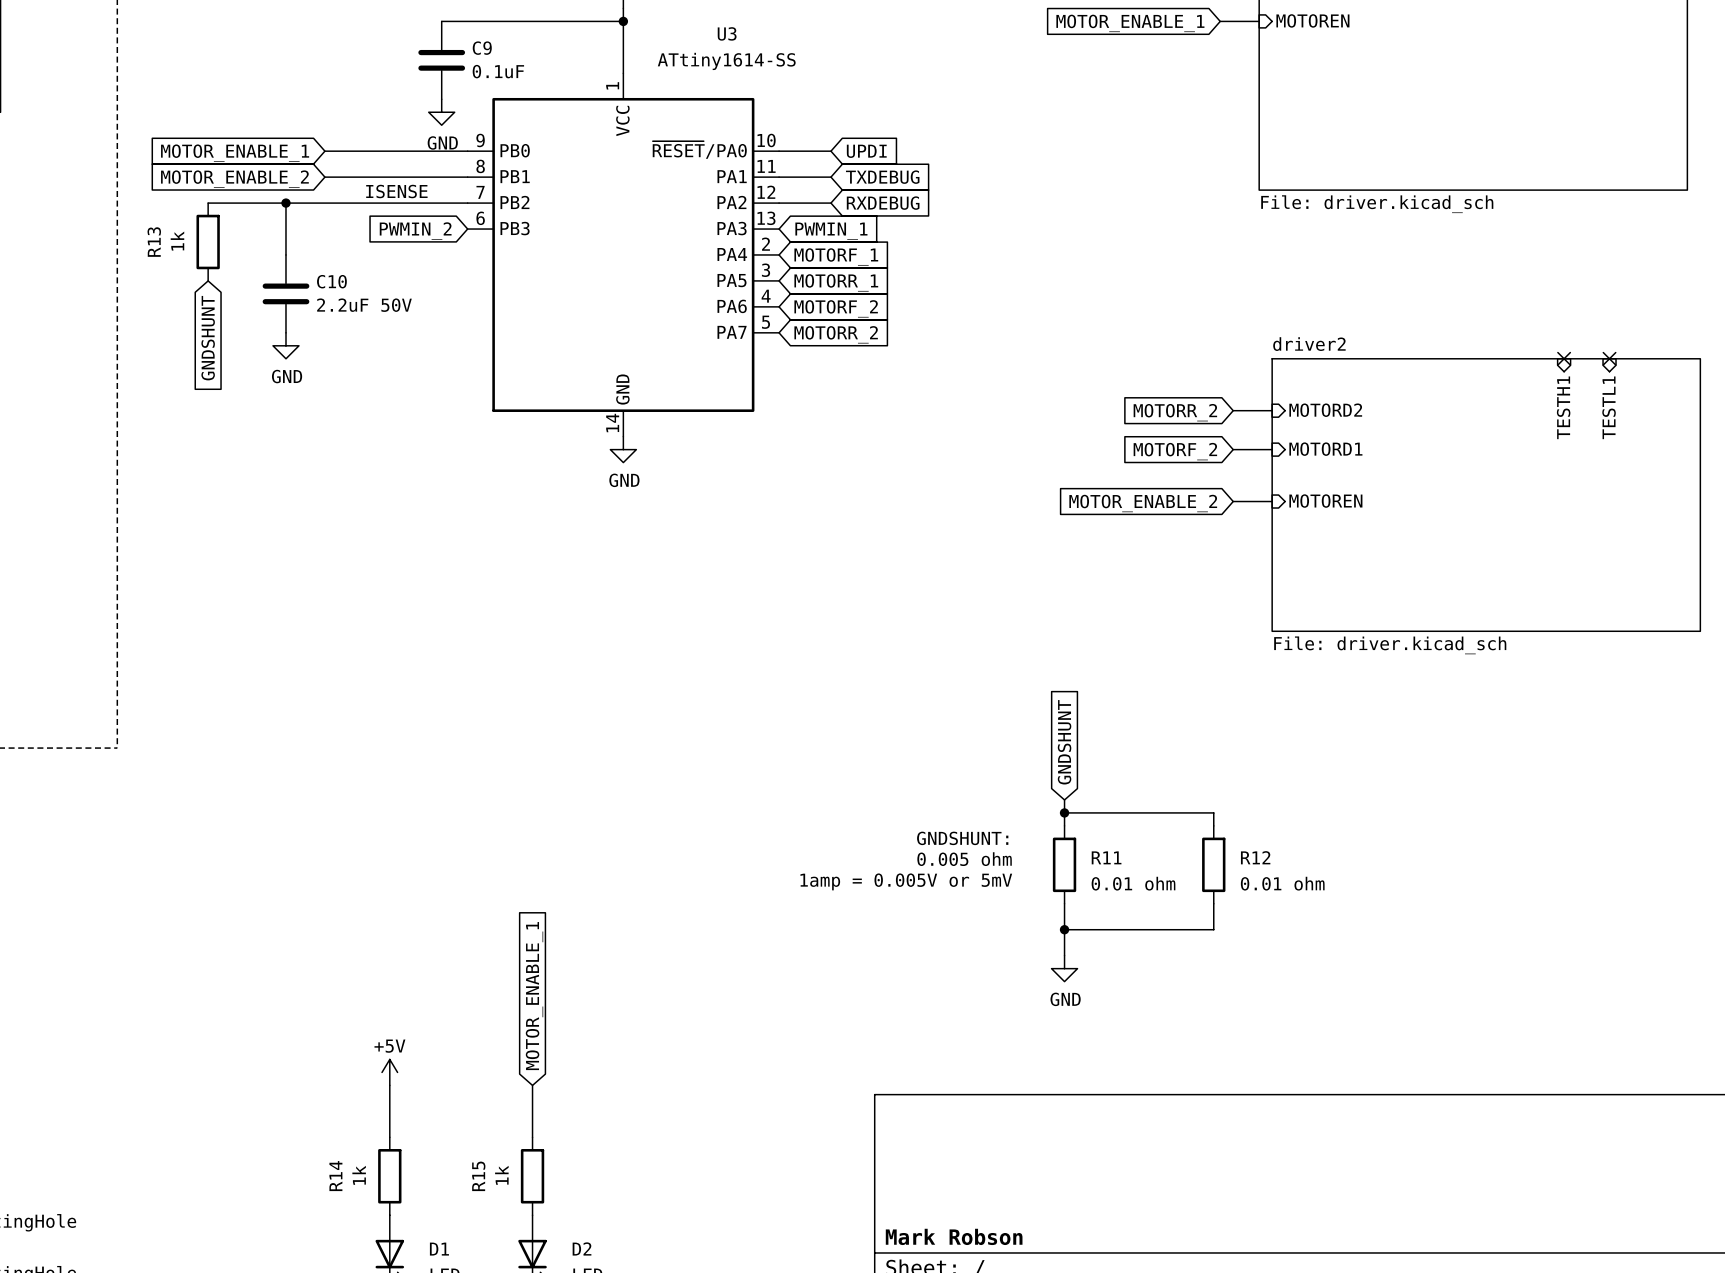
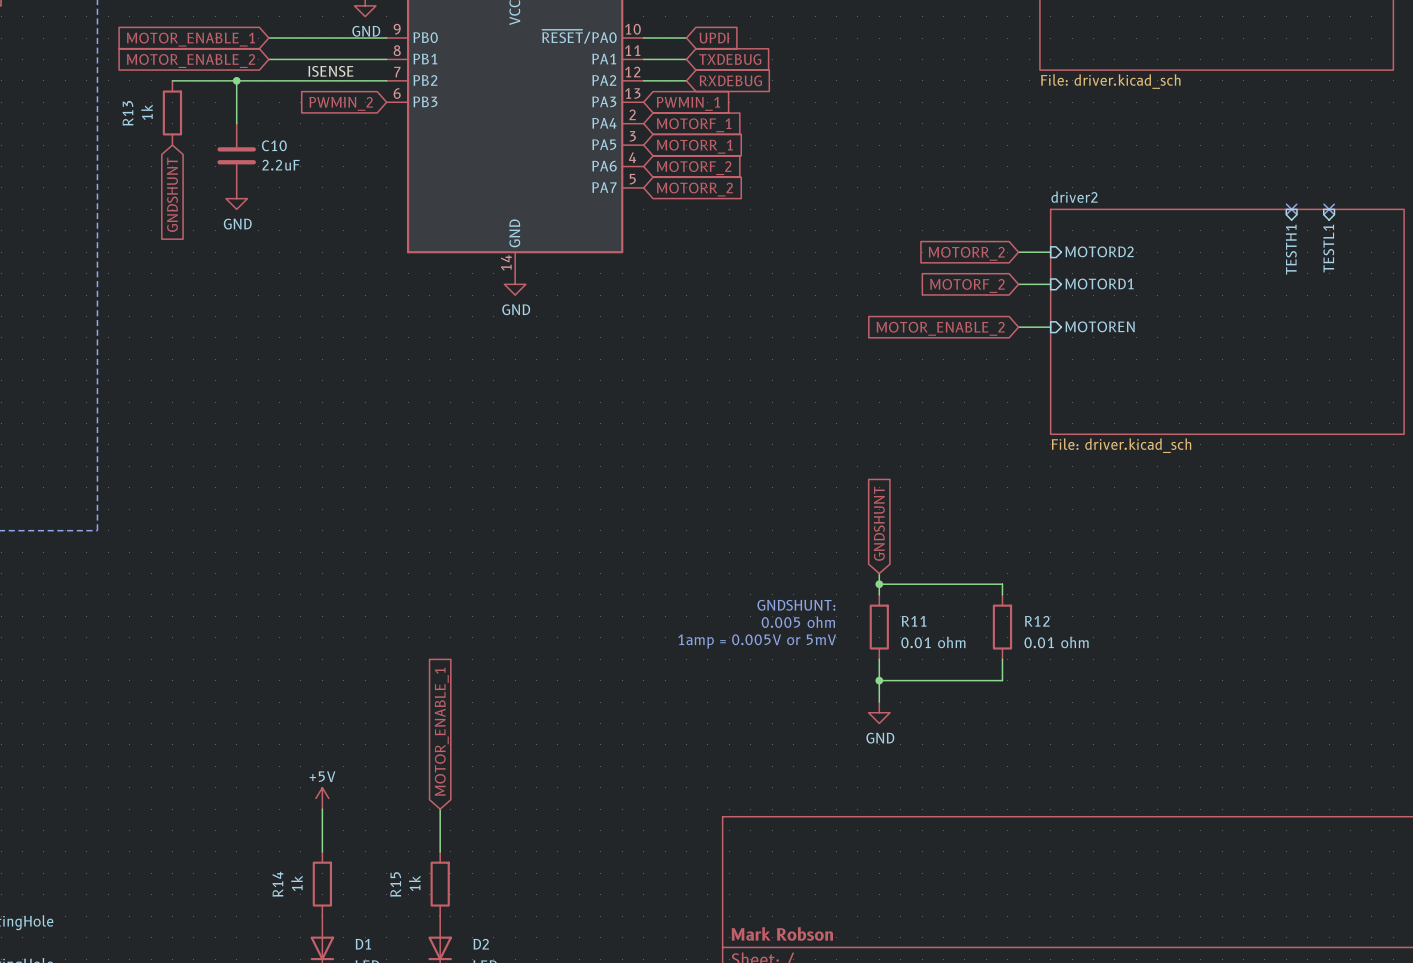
C10 value: 2.2uF 50V (364, 305) -> 2.2uF (281, 165)

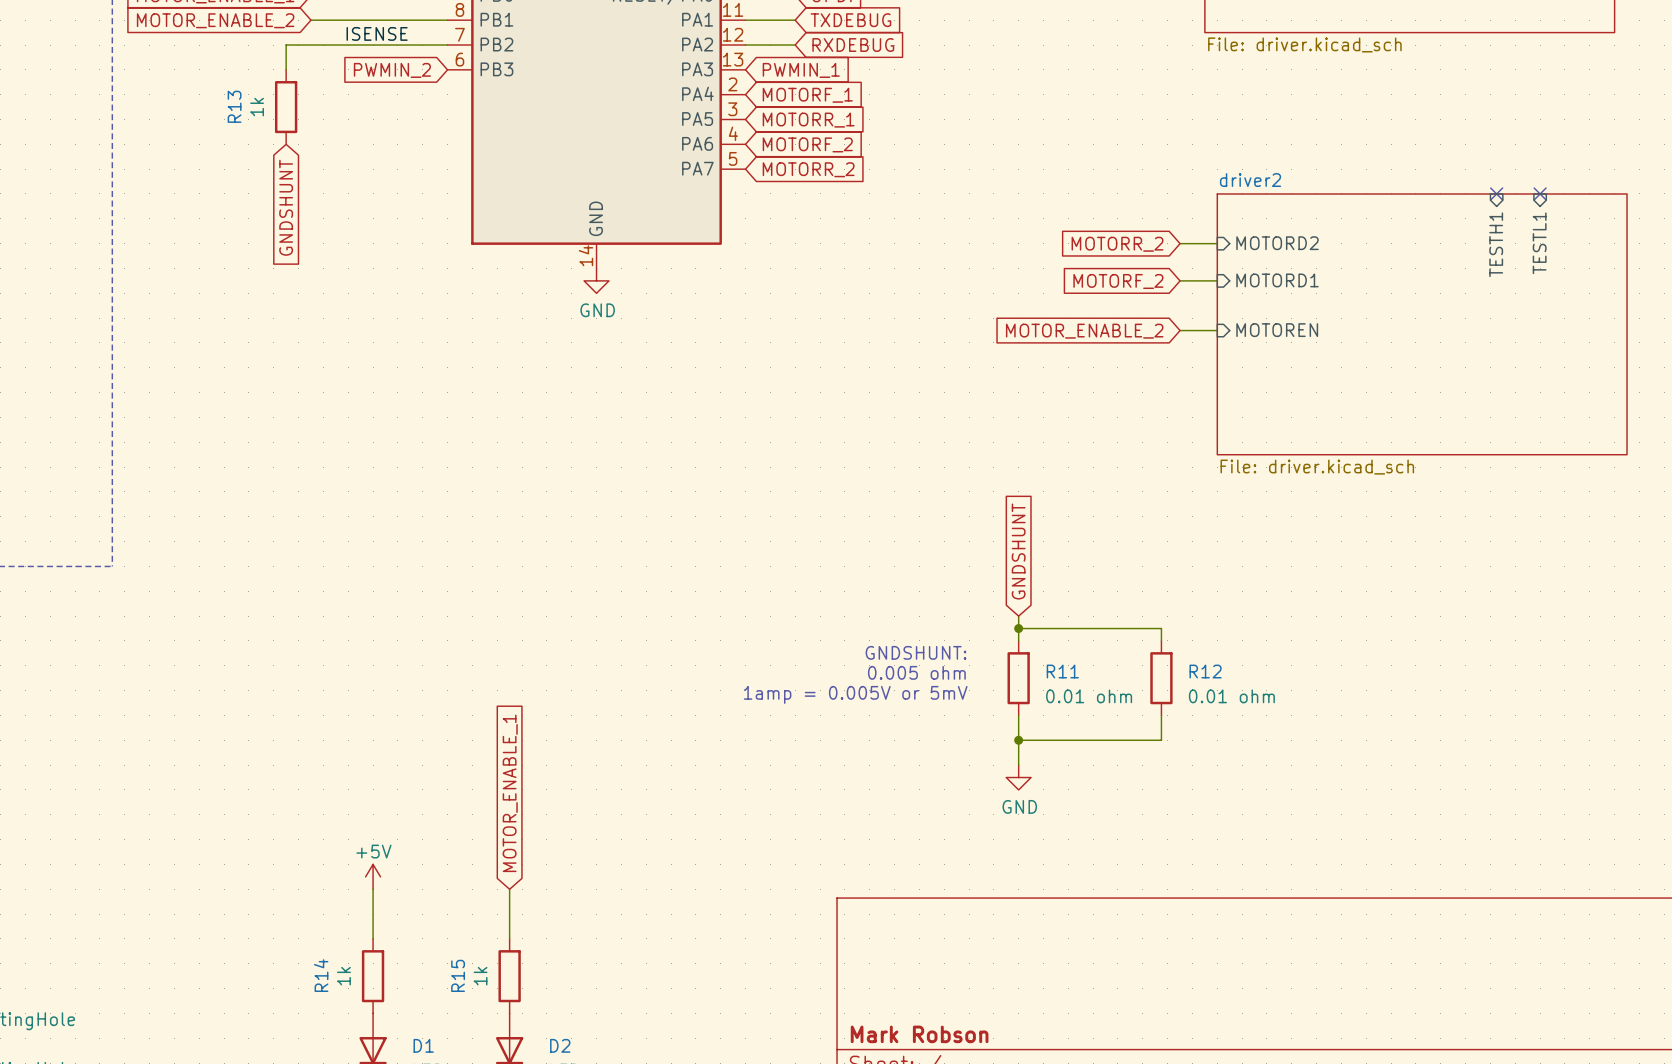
wire: (172, 80) (247, 80) -> (286, 69) (286, 45)
wire: (236, 80) (236, 123) -> none
junction: (236, 80) -> none
R13 position: (172, 112) -> (286, 107)
C10: 2.2uF (236, 155) -> none
global label position: GNDSHUNT (172, 194) -> GNDSHUNT (286, 207)
power symbol: GND (236, 198) -> none

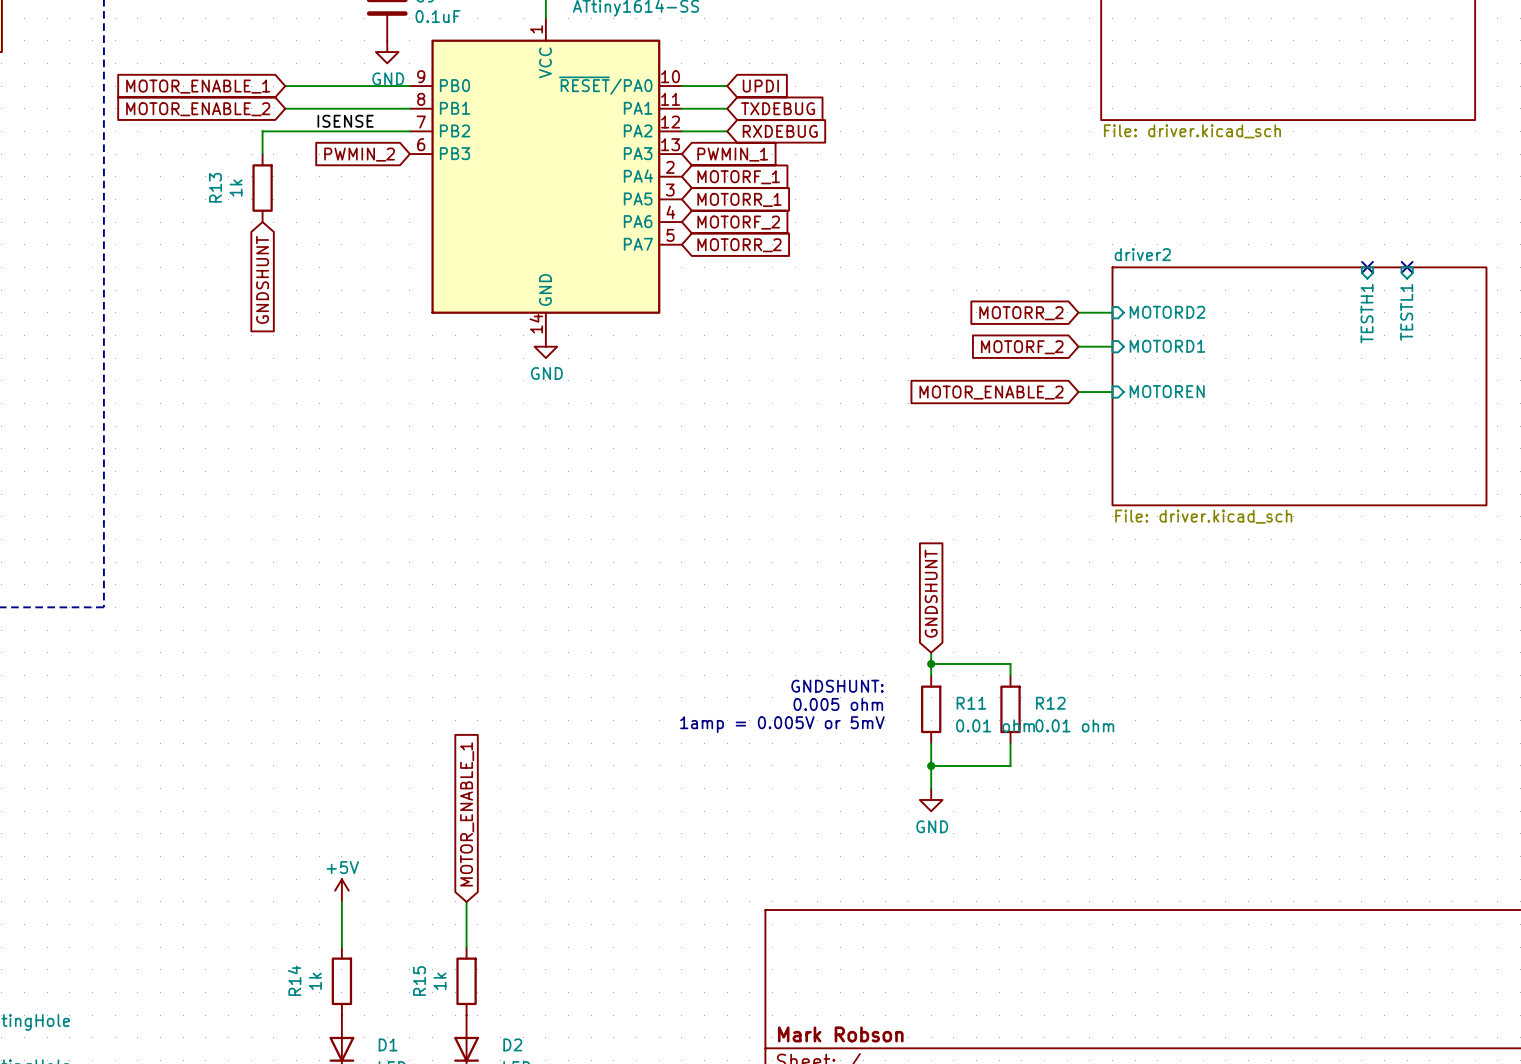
wire: (1105, 628) (1161, 628) (1161, 640) -> (1010, 664) (1010, 675)
R12 position: (1161, 678) -> (1010, 709)
wire: (1161, 715) (1161, 740) (1105, 740) -> (1010, 743) (1010, 765)

